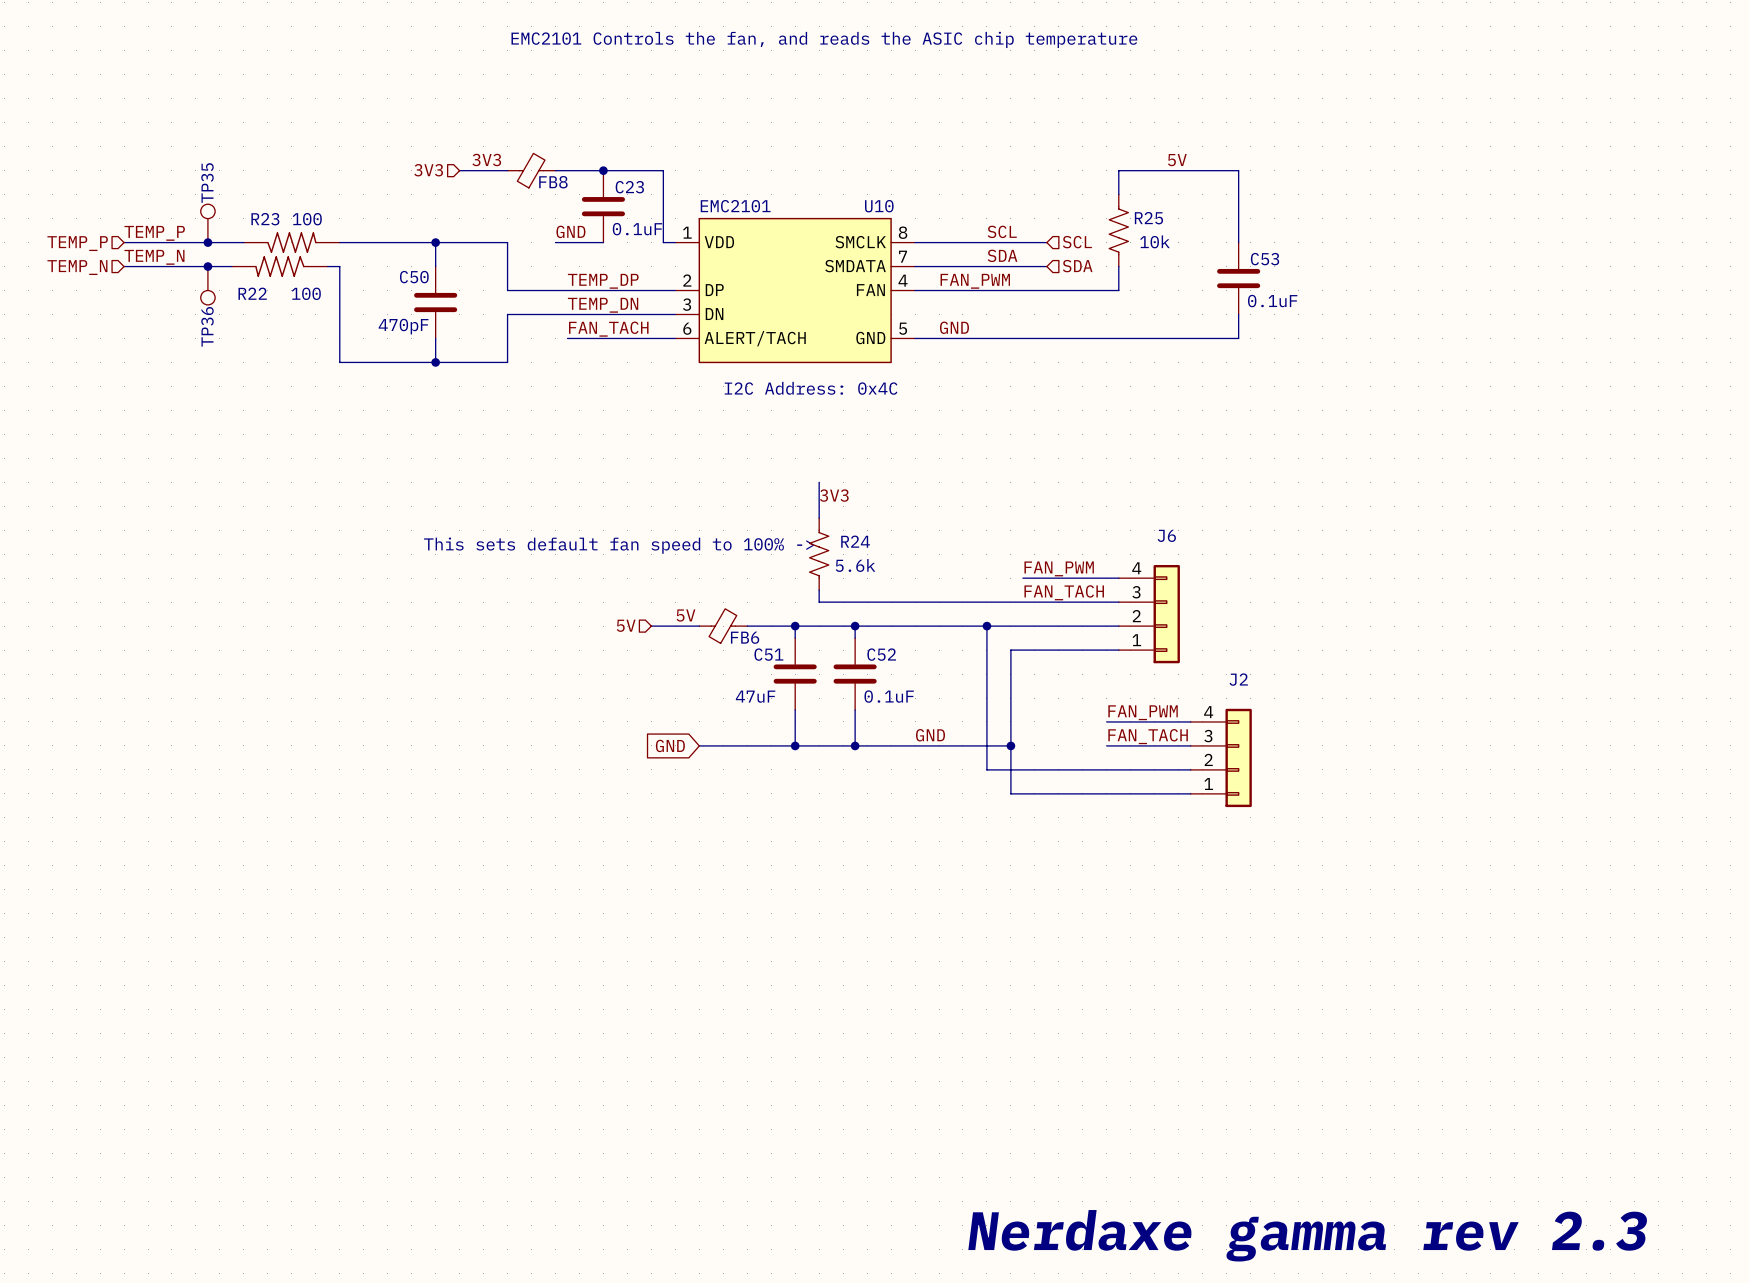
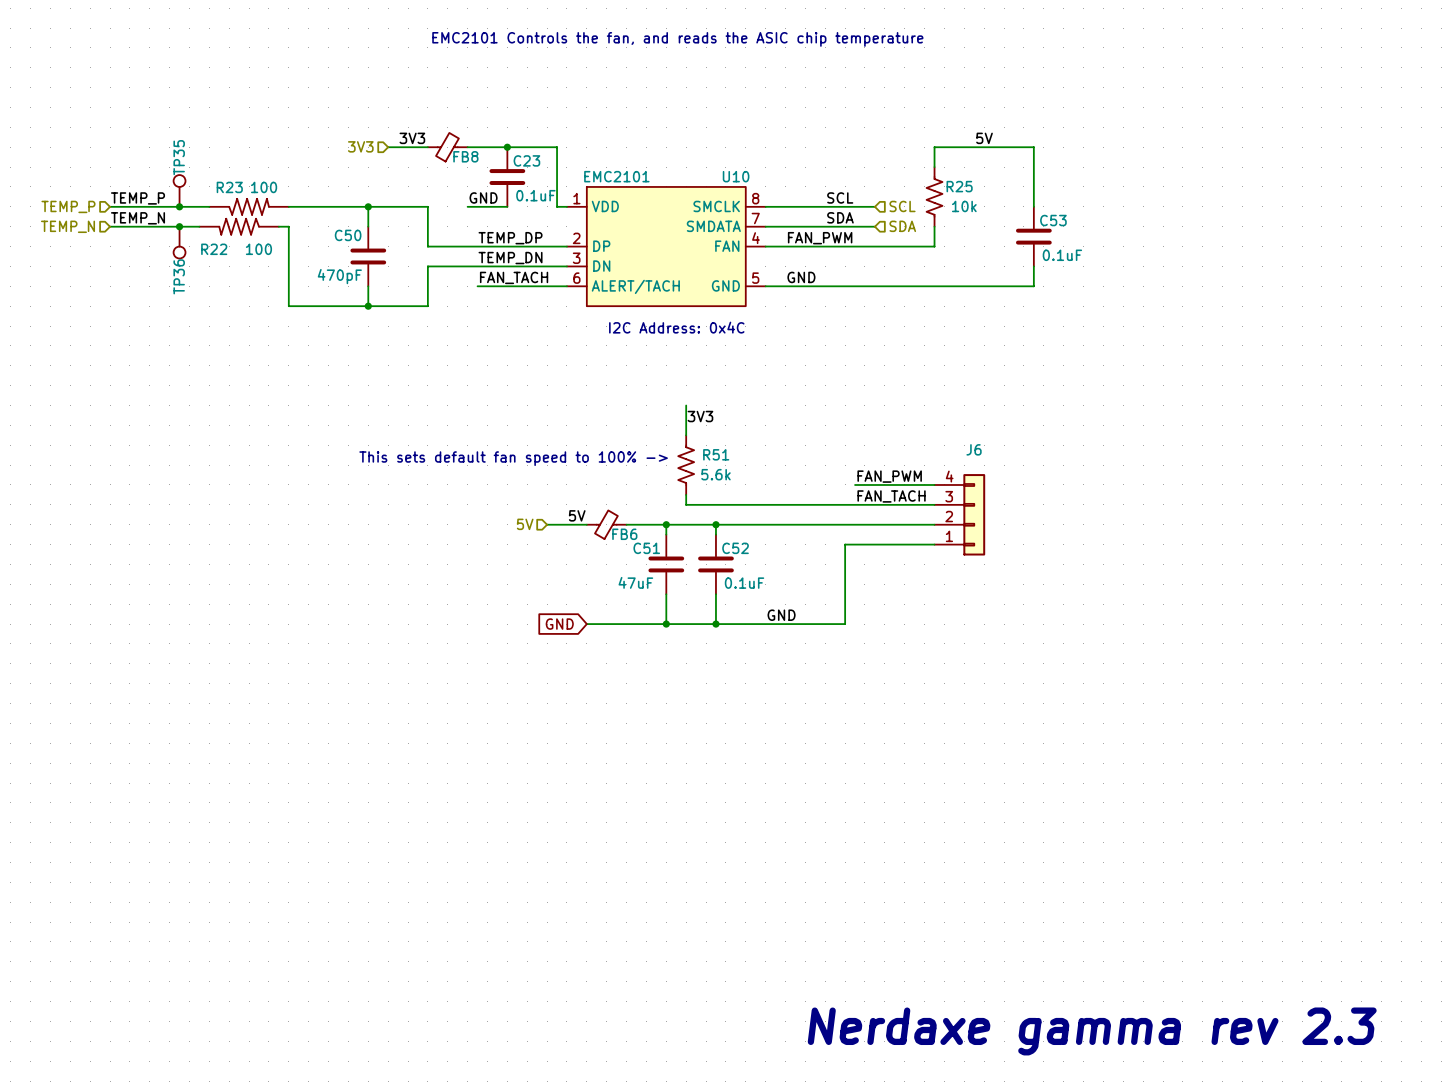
R24 name: R24 (855, 541) -> R51 (716, 454)
wire: (986, 626) (986, 769) (1190, 769) -> none
junction: (986, 626) -> none
label: FAN_PWM (1143, 712) -> none
wire: (1106, 721) (1190, 721) -> none
label: FAN_TACH (1148, 736) -> none
wire: (1010, 745) (1010, 793) (1190, 793) -> none
junction: (1010, 745) -> none
wire: (1106, 745) (1190, 745) -> none
J2: (1221, 757) -> none

